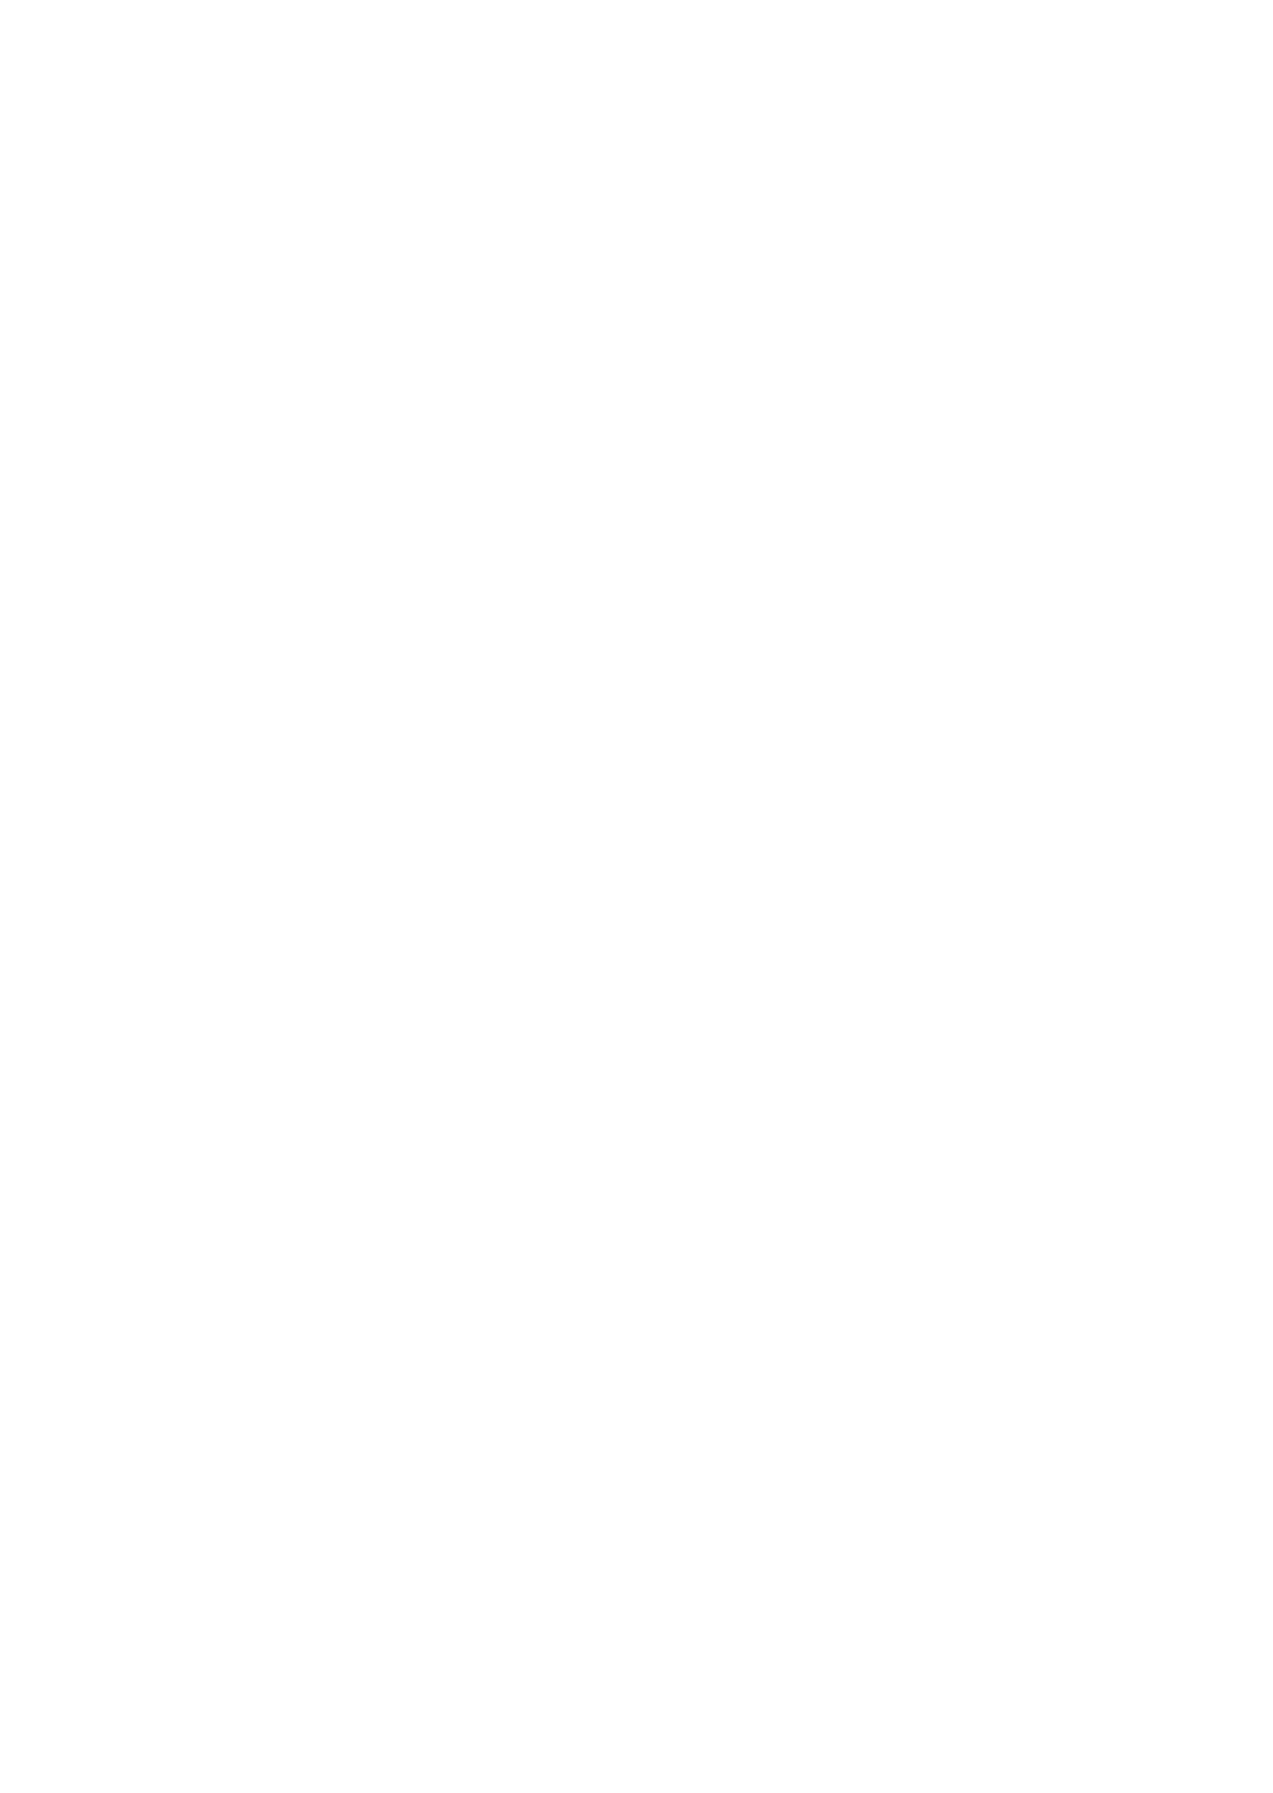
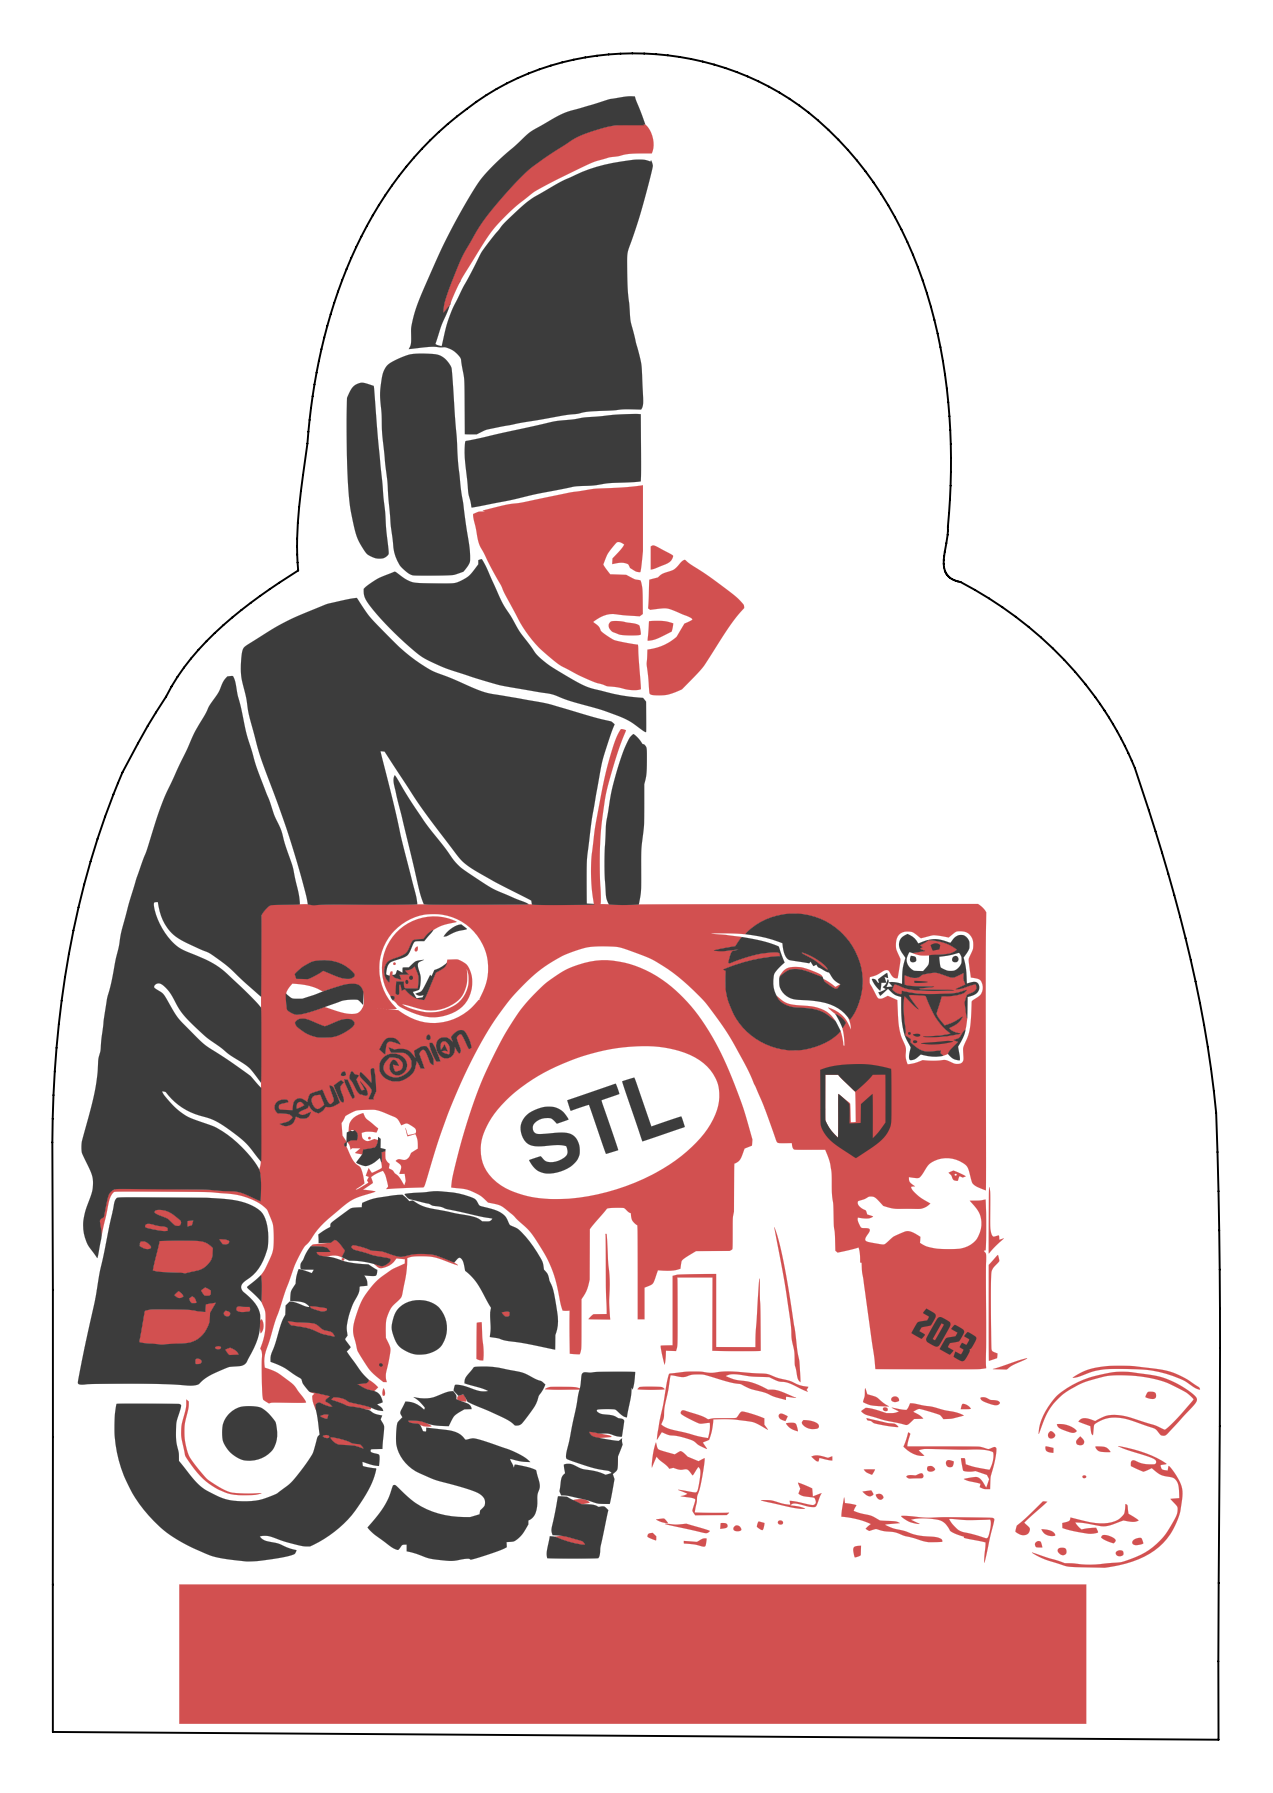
board edge: none -> (632, 53) (667, 55) (702, 61) (736, 72) (768, 86) (799, 105) (828, 129) (847, 149) (873, 182) (895, 217) (912, 254) (926, 293) (940, 347) (946, 388) (950, 444) (949, 499) (943, 559) (945, 572) (951, 578) (974, 589) (1015, 616) (1064, 659) (1104, 710) (1121, 738) (1134, 768) (1168, 873) (1190, 959) (1207, 1046) (1216, 1112) (1219, 1308) (1218, 1739) (52, 1731) (52, 1142) (54, 1071) (61, 1000) (73, 930) (90, 861) (105, 816) (122, 772) (137, 743) (177, 676) (190, 658) (232, 617) (298, 570) (297, 538) (300, 490) (312, 396) (324, 337) (338, 291) (351, 258) (372, 215) (391, 185) (413, 157) (438, 131) (466, 108) (496, 88) (528, 73) (562, 62) (596, 55) (632, 53)
drawing: none -> [77, 96, 1201, 1724]

